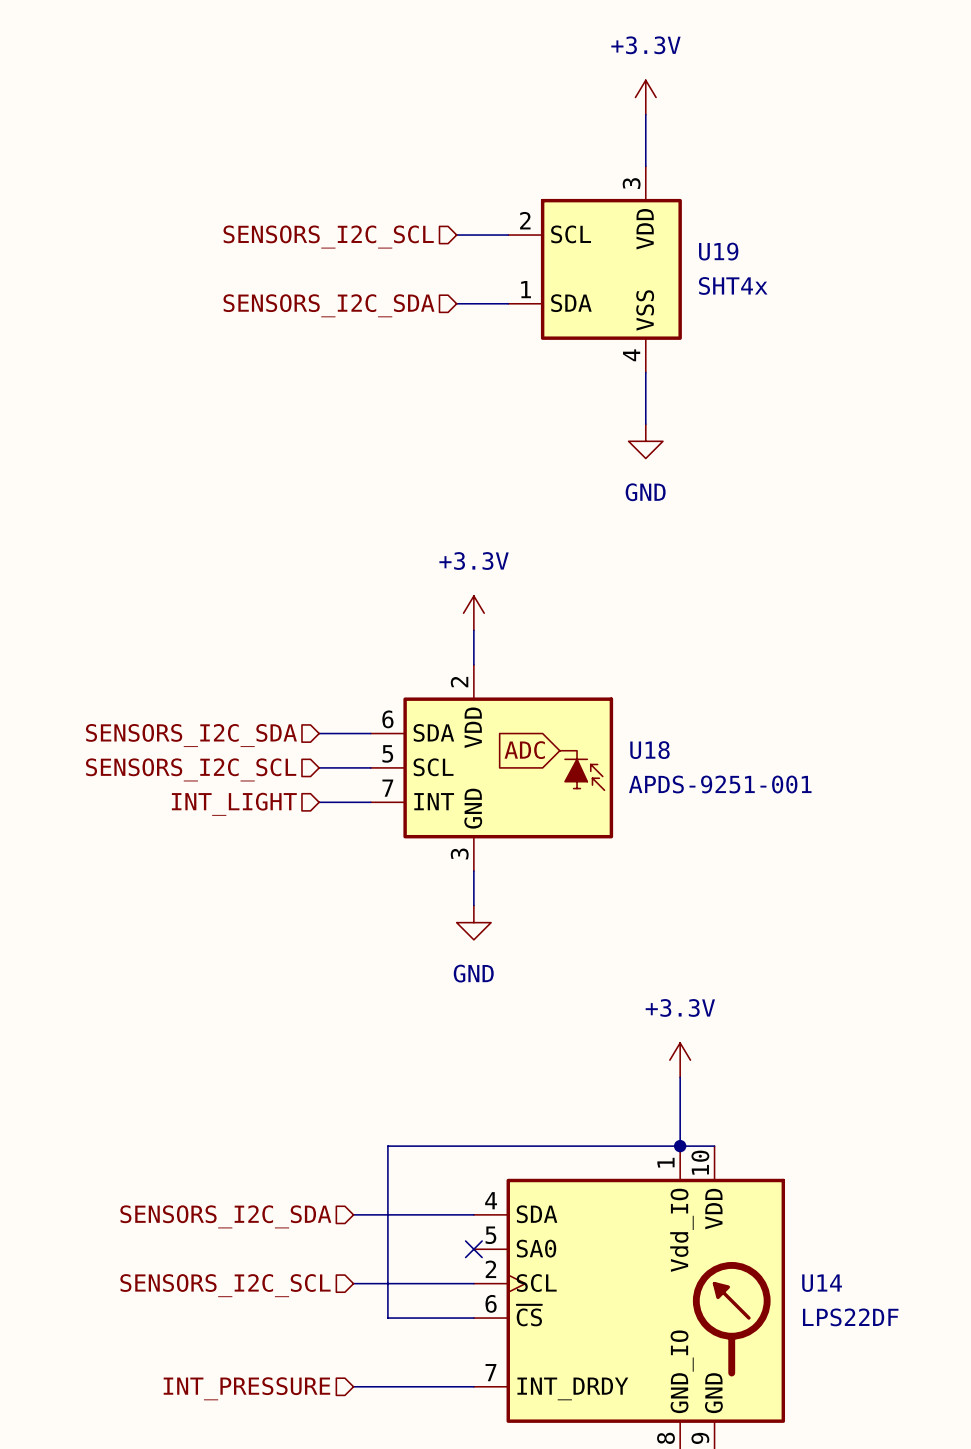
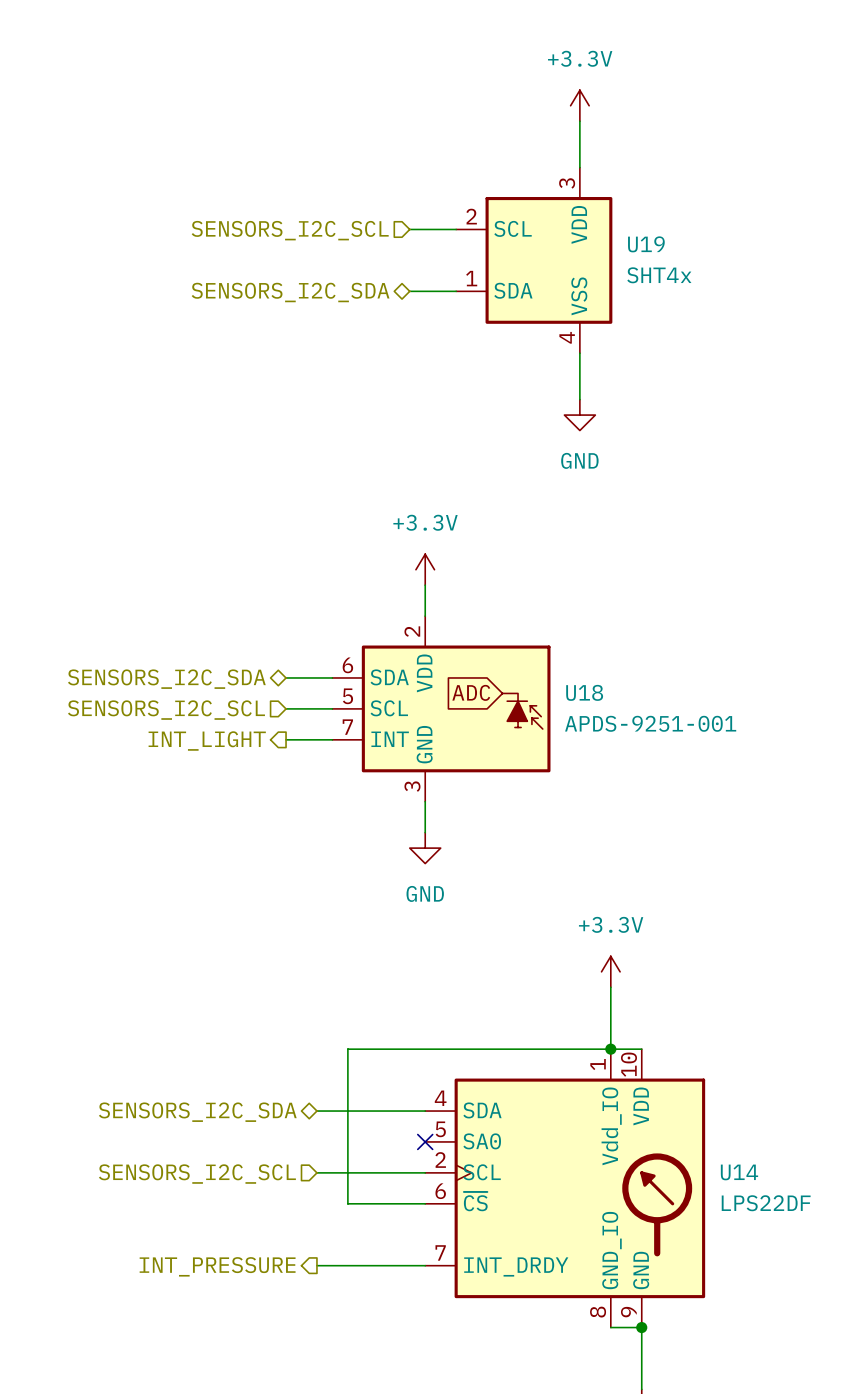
hierarchical label shape: input (328, 305) -> bidirectional (290, 292)
hierarchical label shape: input (191, 735) -> bidirectional (166, 679)
hierarchical label shape: input (234, 804) -> output (207, 741)
hierarchical label shape: input (225, 1216) -> bidirectional (197, 1112)
hierarchical label shape: input (246, 1388) -> output (217, 1266)

